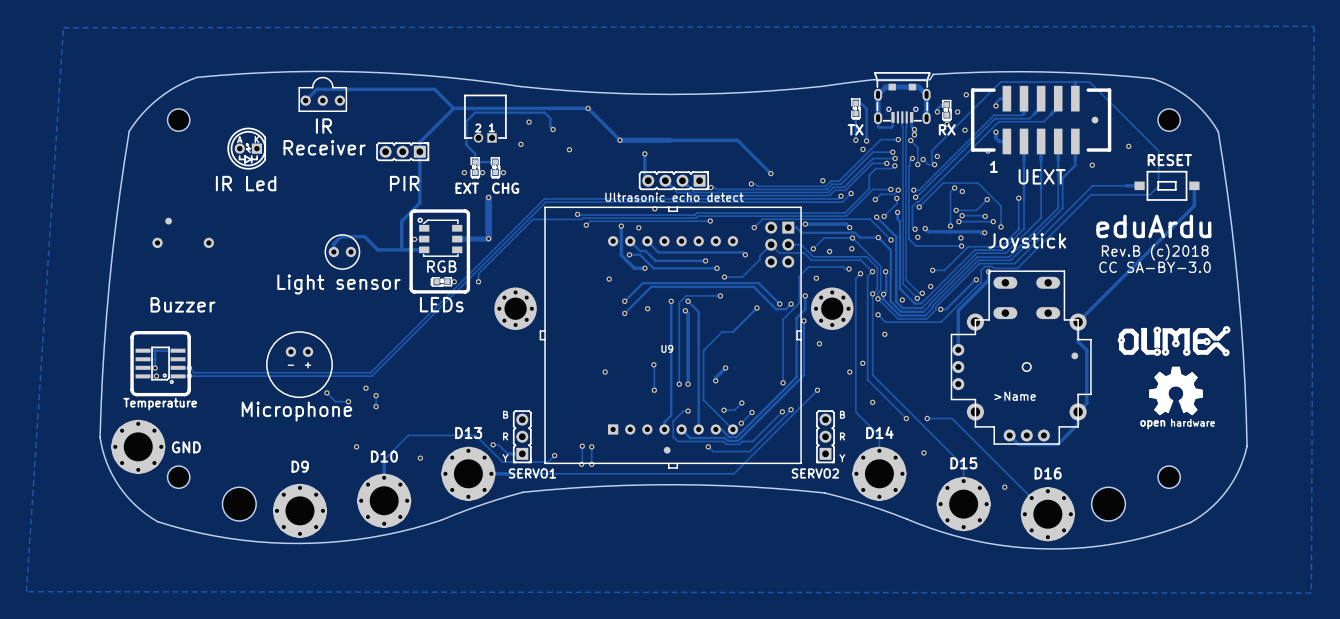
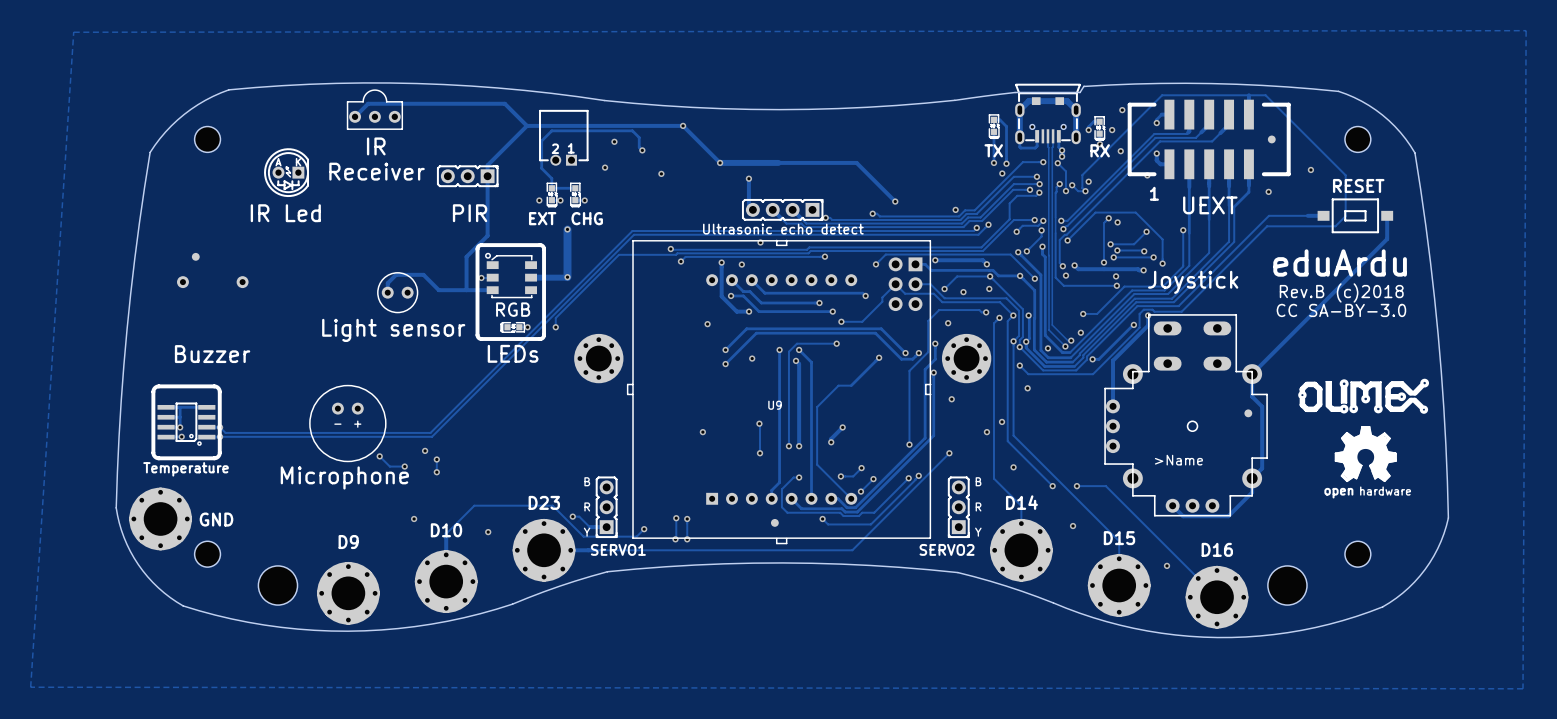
text: D13 (468, 433) -> D23 (544, 502)

